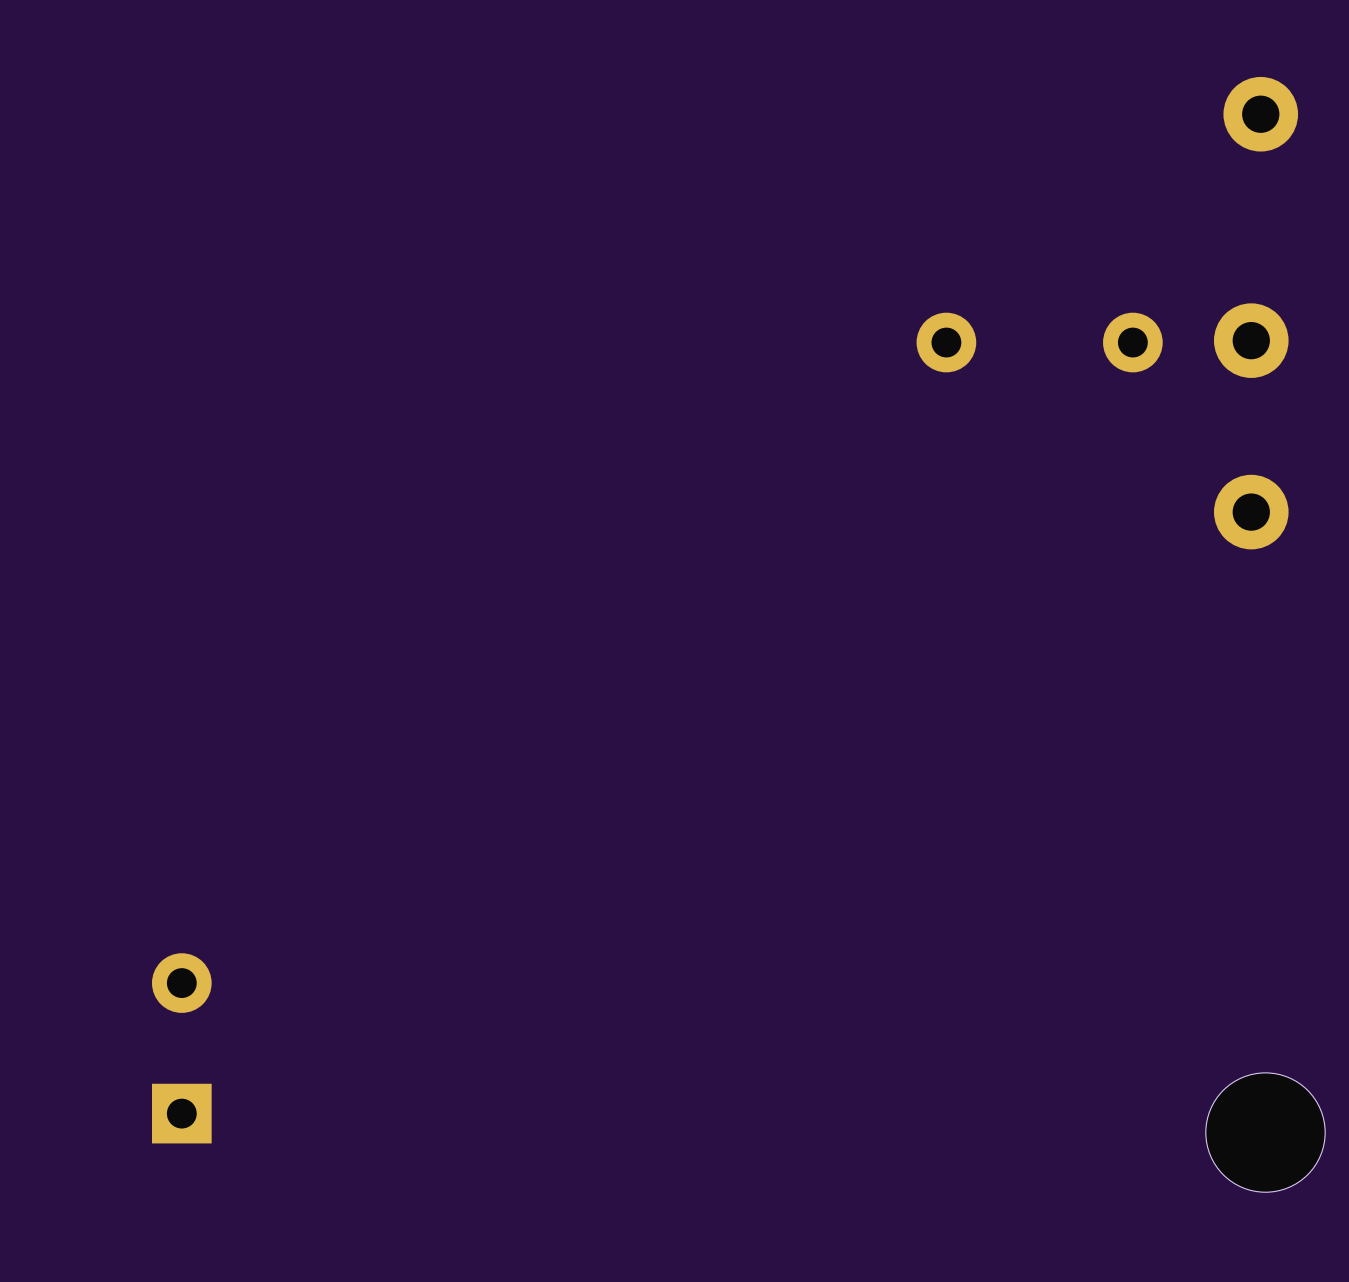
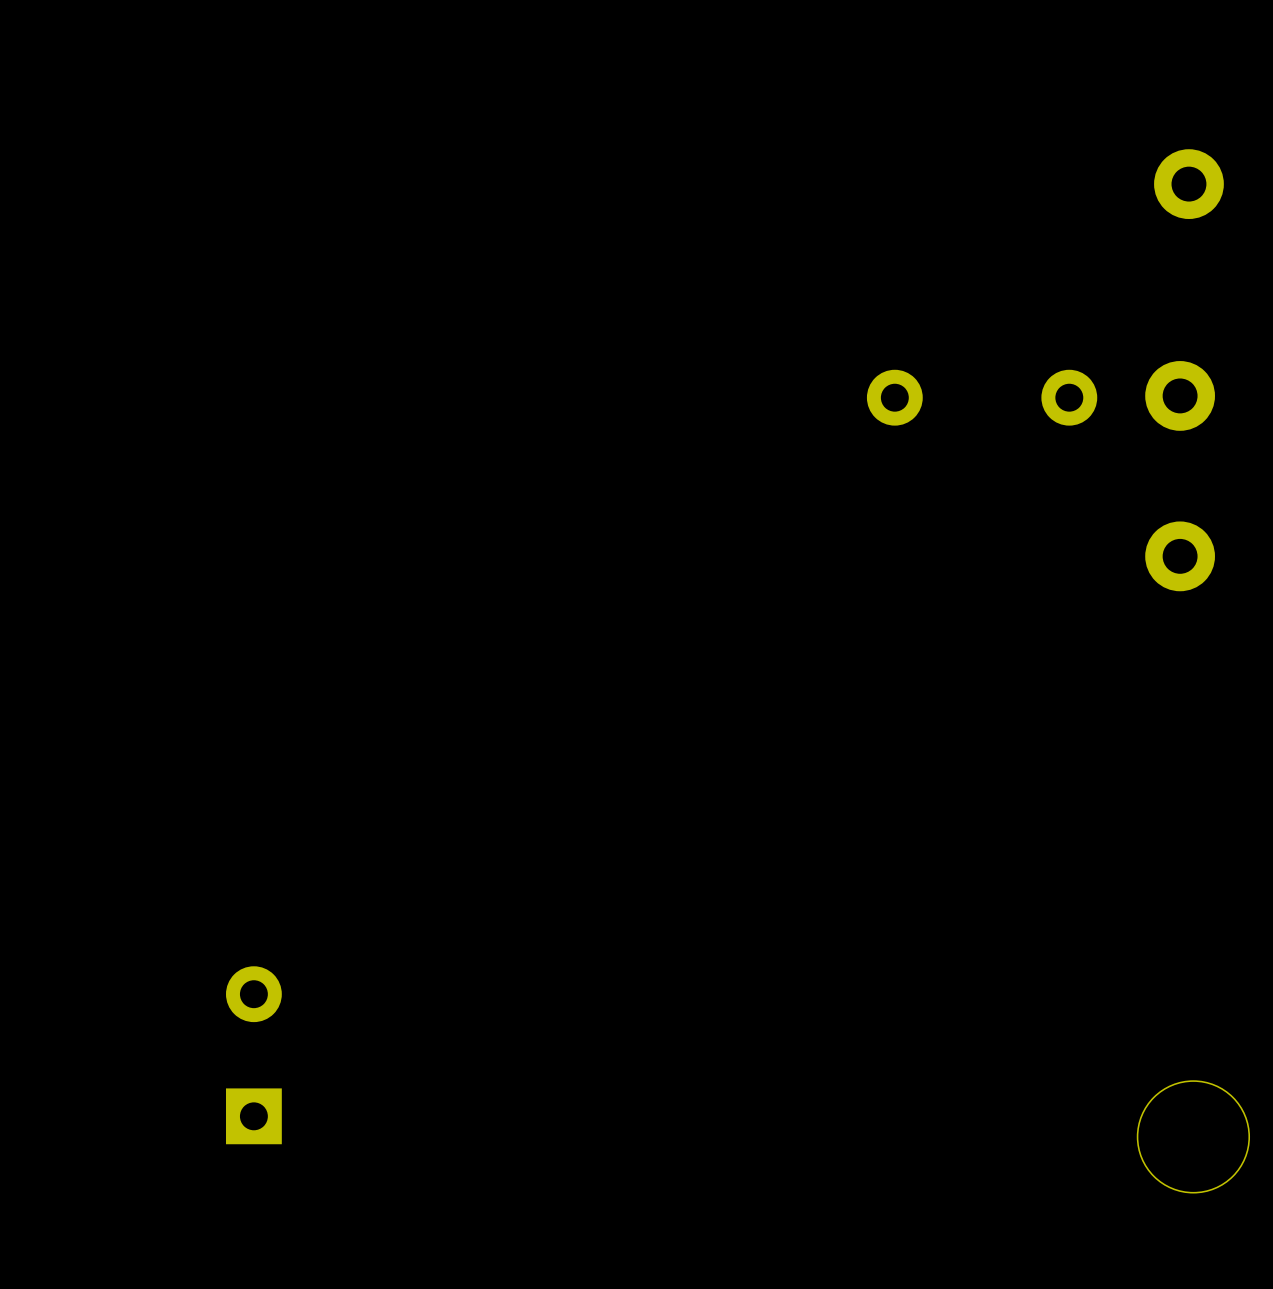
part position: (181, 1048) -> (253, 1055)

